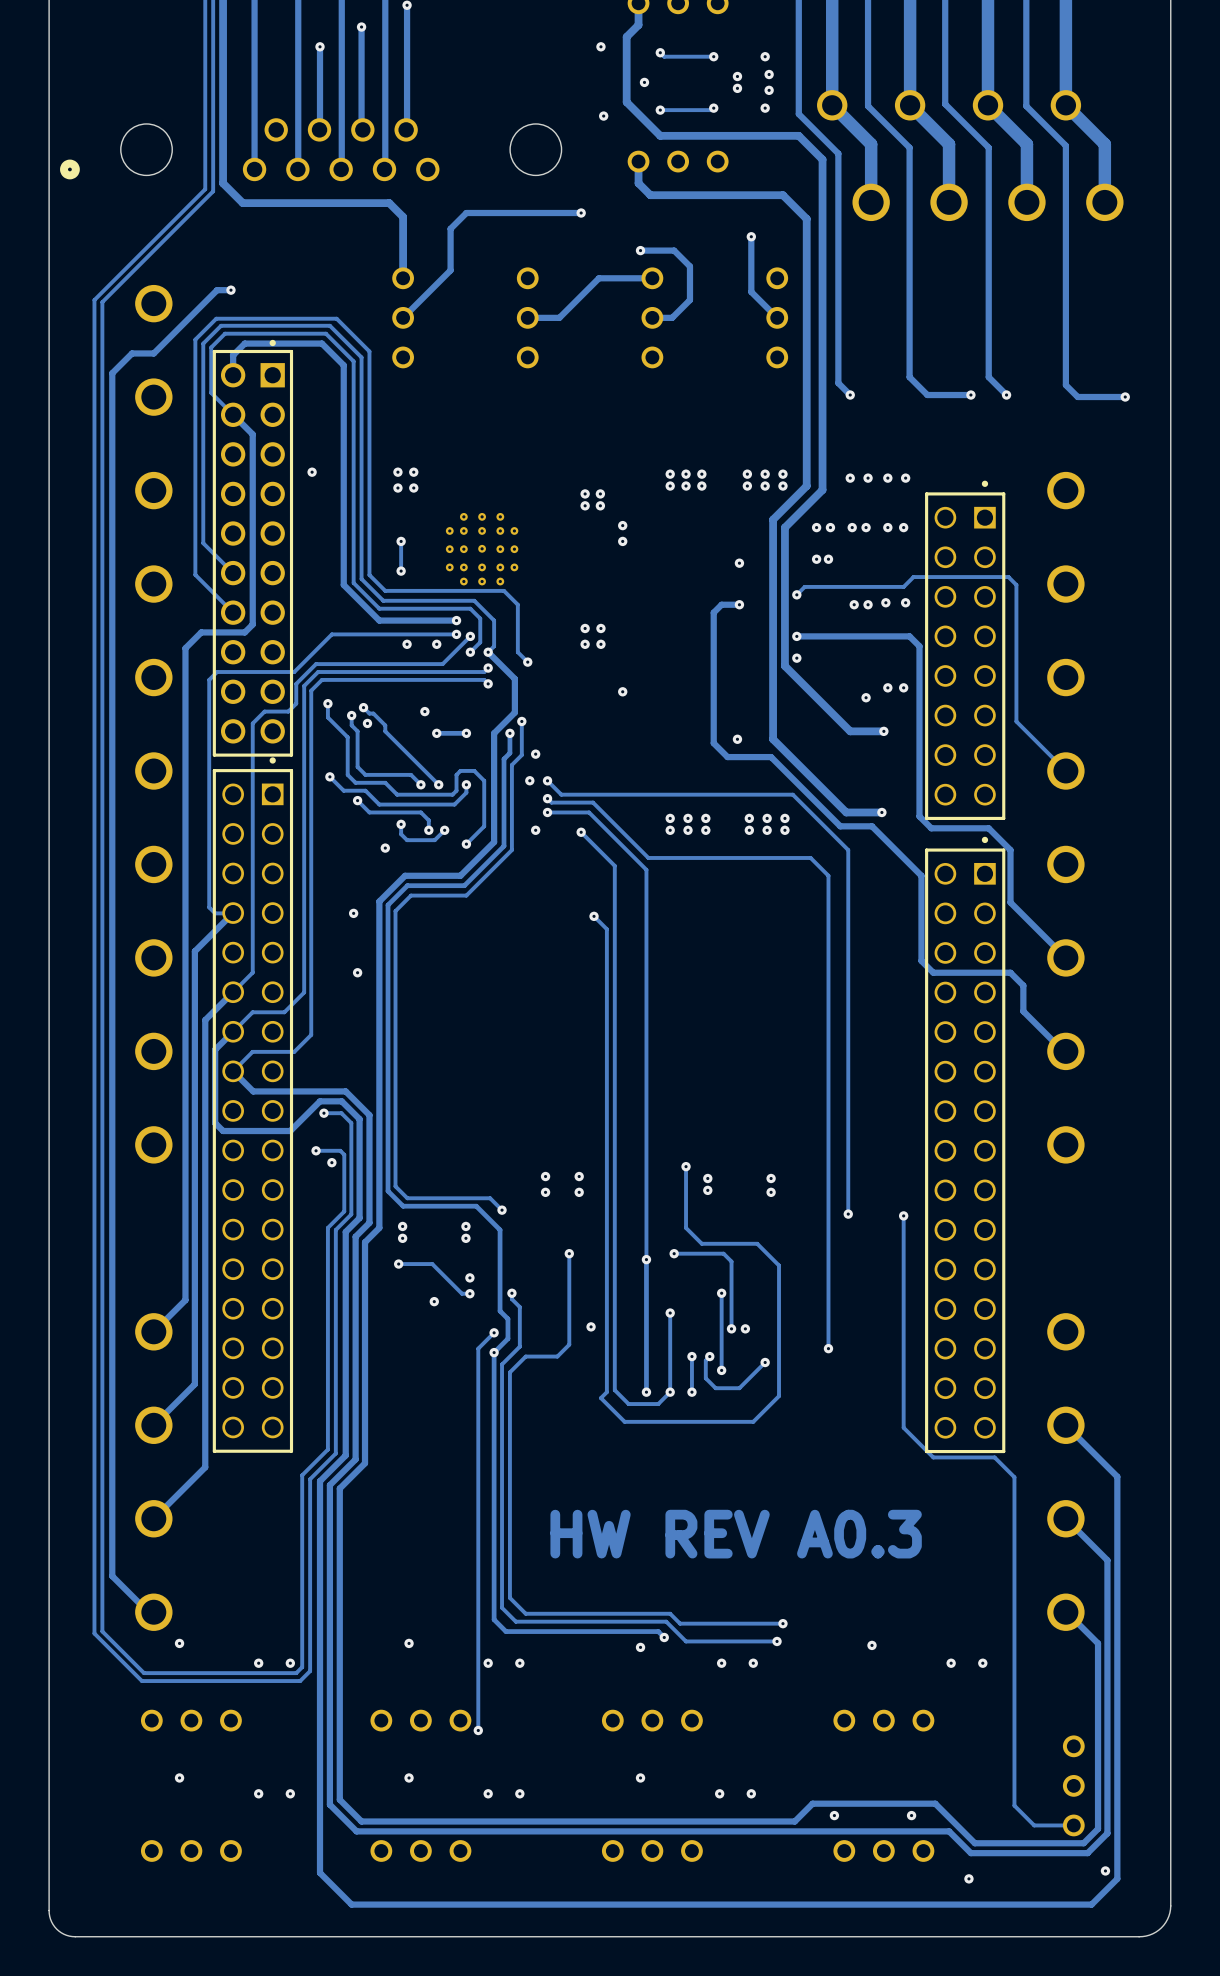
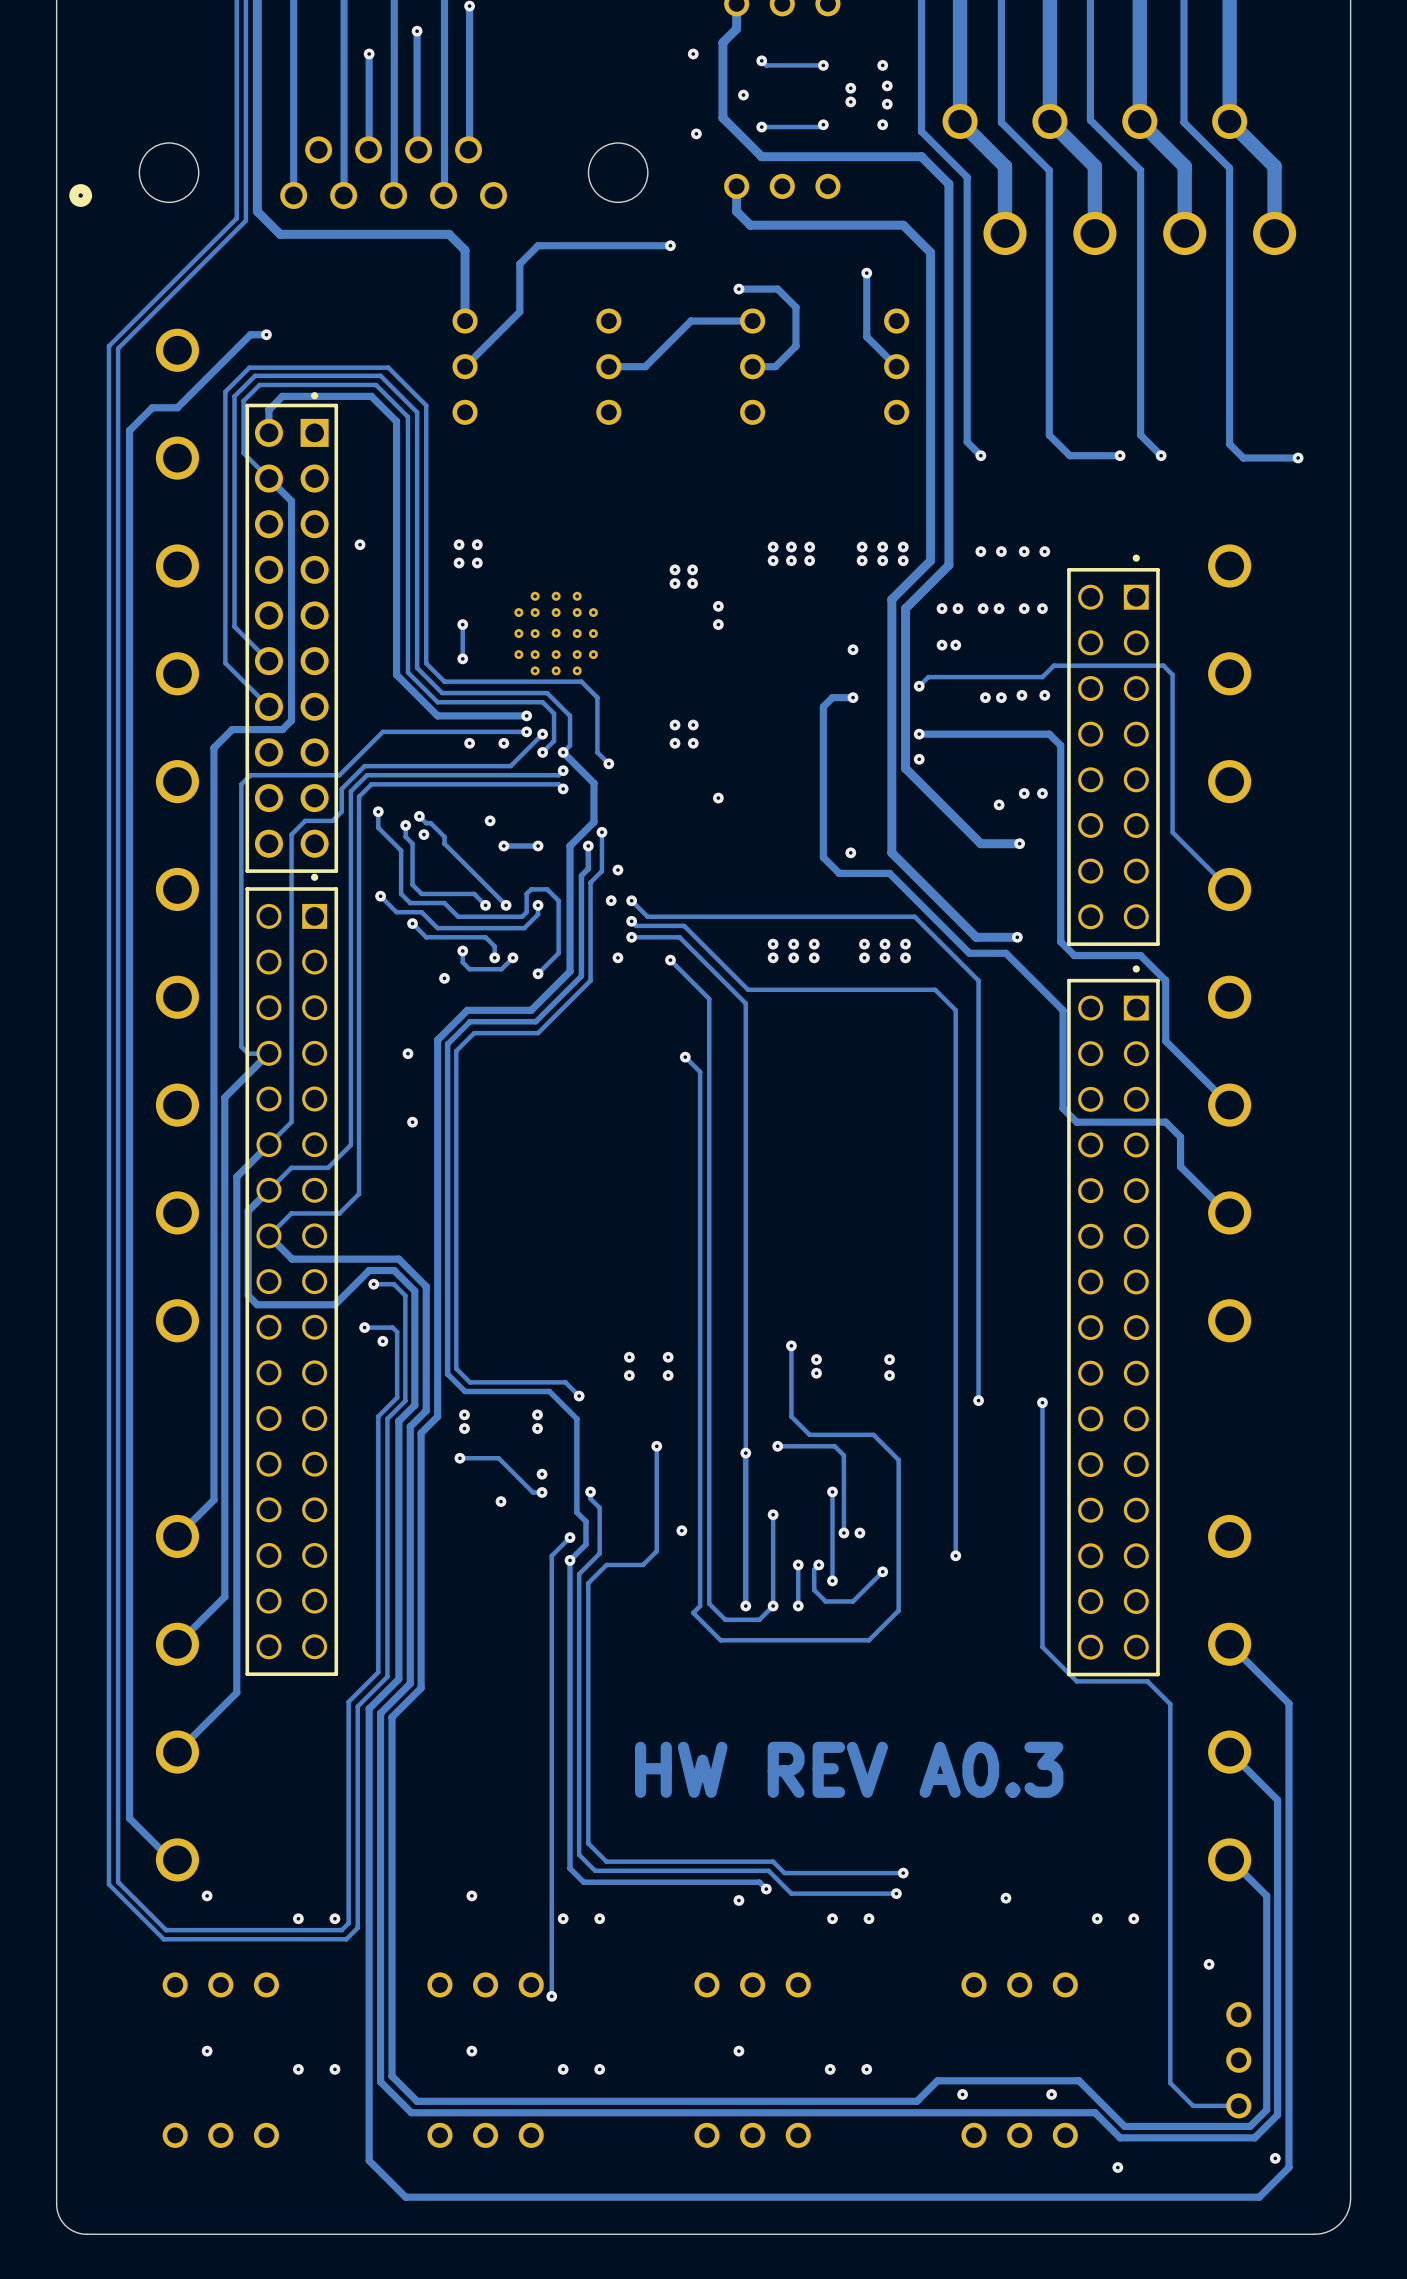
via: none -> (1209, 1964)

